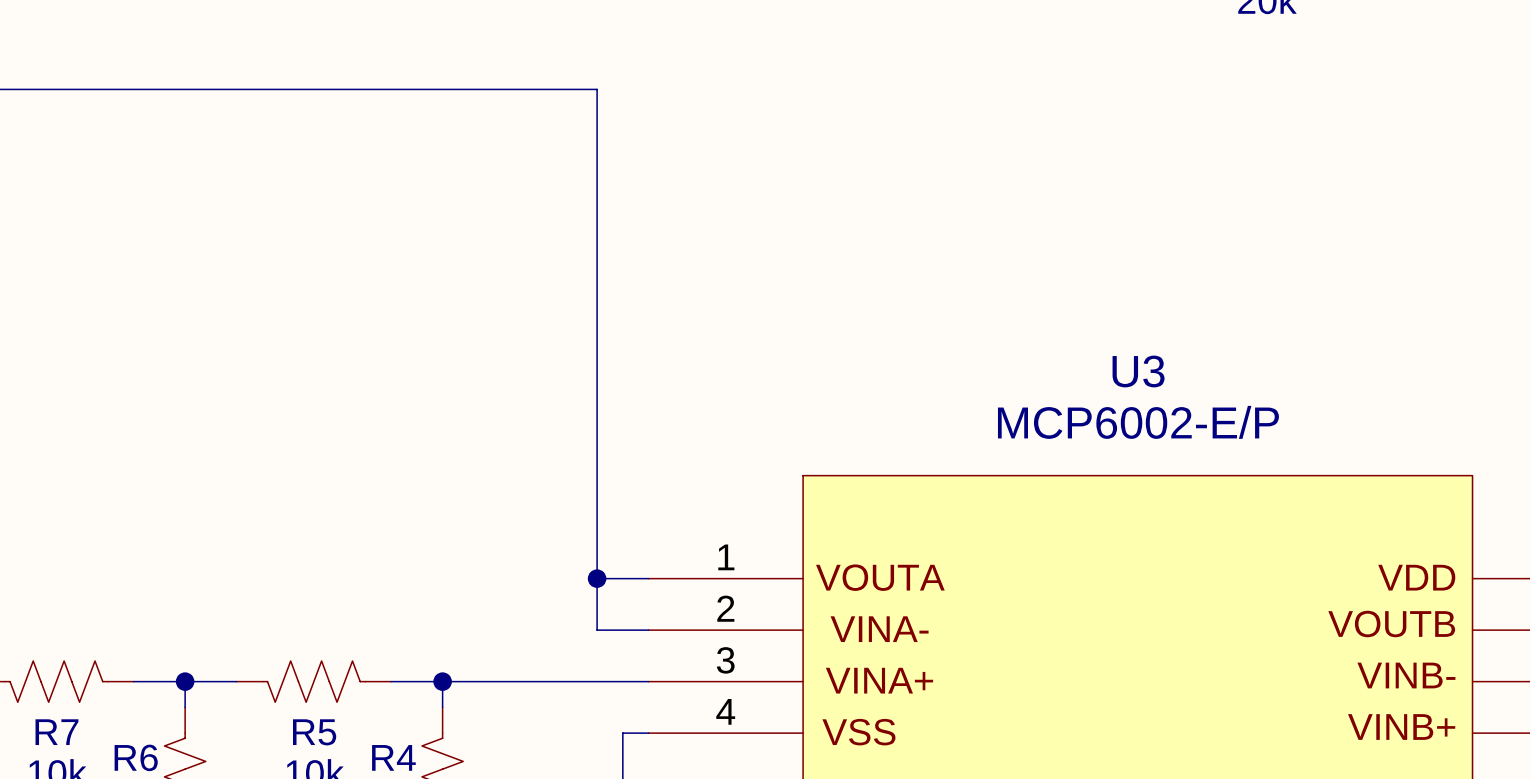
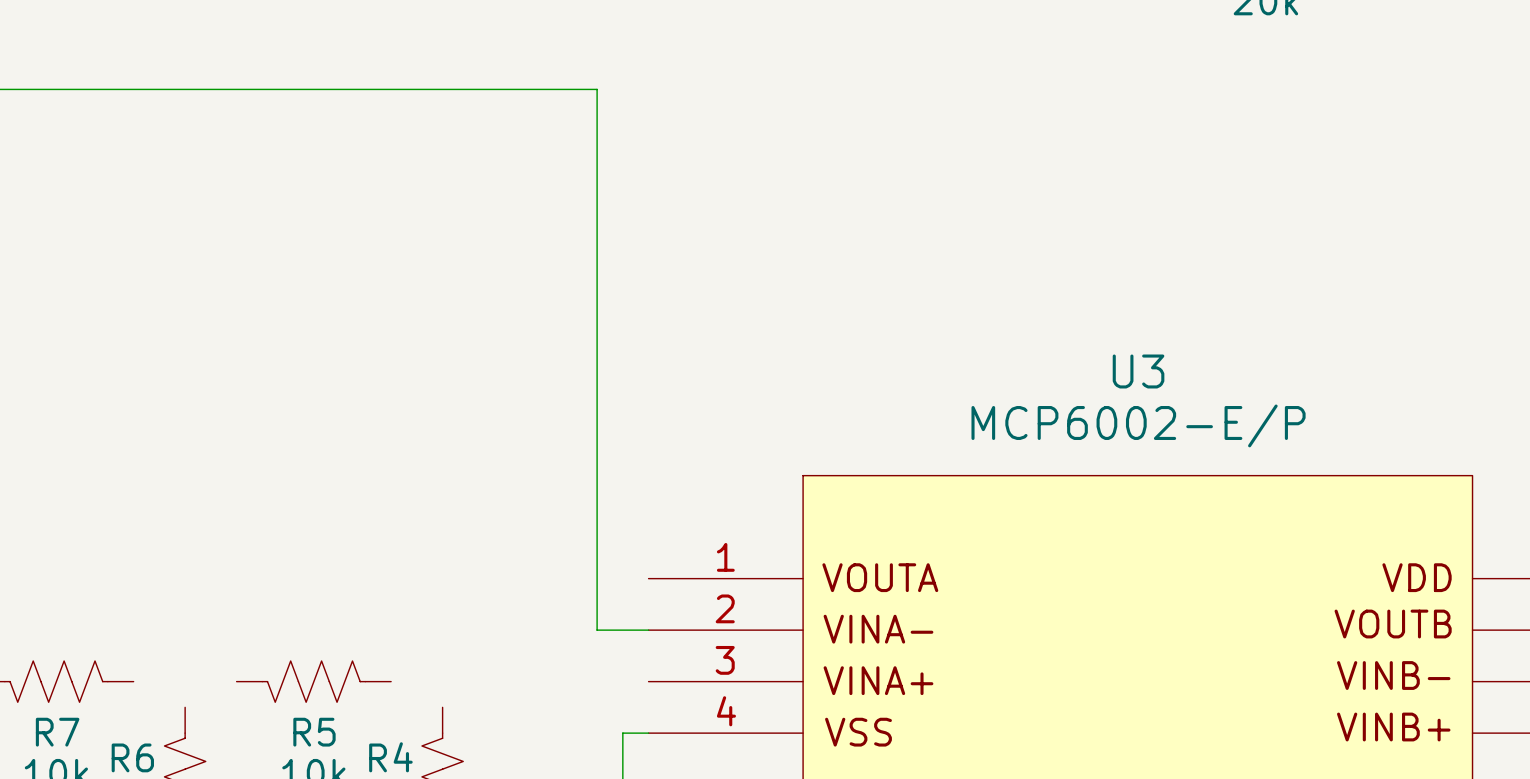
wire: (597, 578) (648, 578) -> none
junction: (597, 578) -> none
wire: (133, 681) (236, 681) -> none
wire: (185, 681) (185, 707) -> none
junction: (185, 681) -> none
wire: (391, 681) (648, 681) -> none
wire: (442, 681) (442, 707) -> none
junction: (442, 681) -> none

